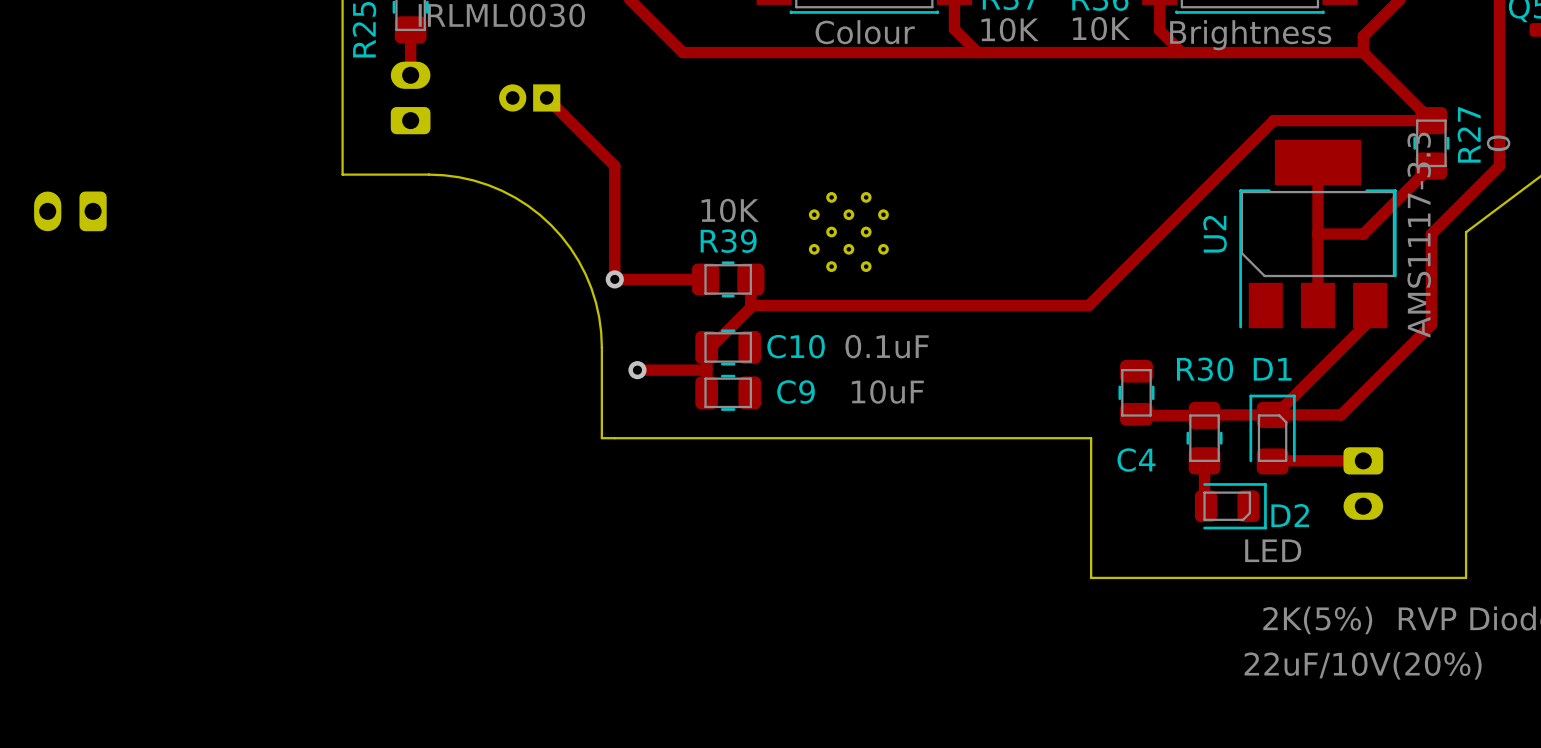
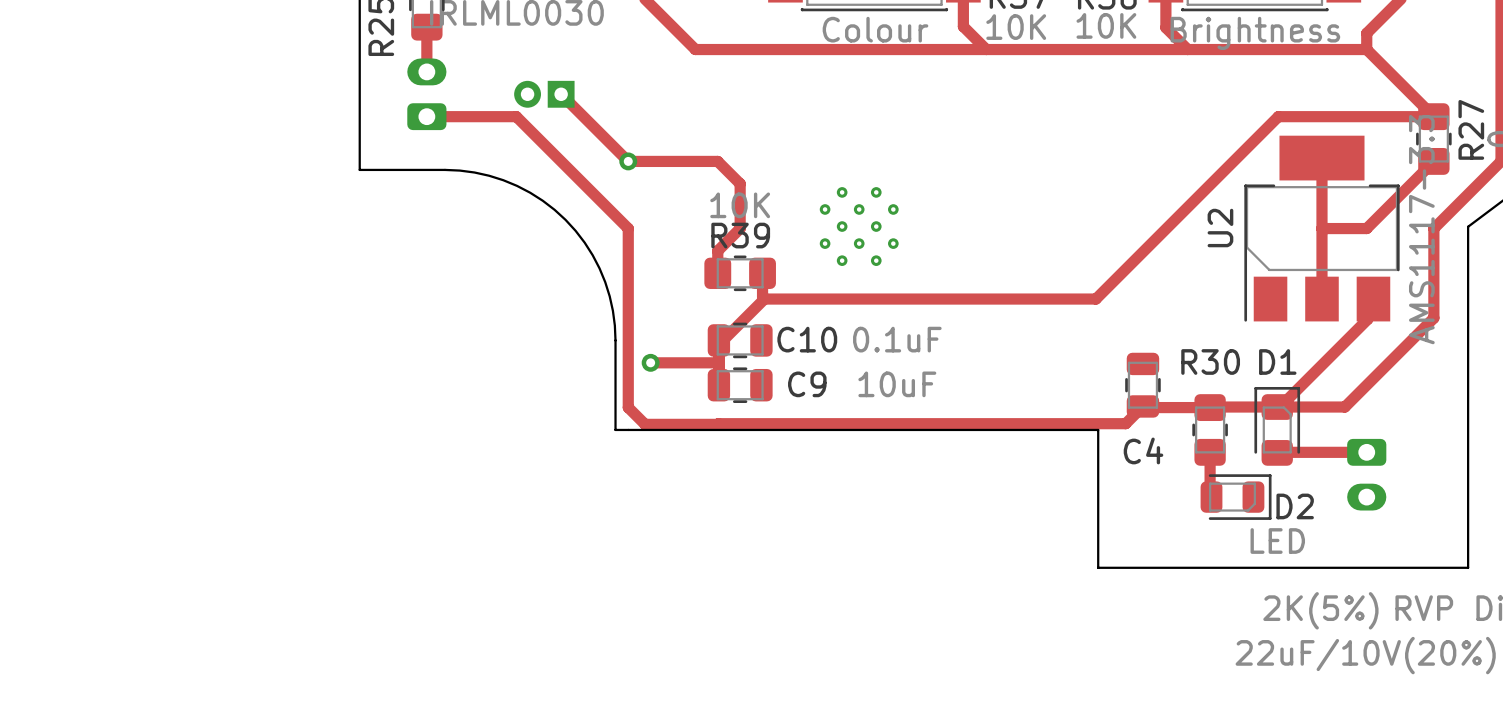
track: none -> (426, 116) (516, 116) (628, 228)
track: (614, 165) (614, 234) -> (628, 161) (717, 161) (740, 183) (740, 228) (717, 250) (717, 273)
part: (70, 211) -> none
track: (614, 279) (705, 279) -> (628, 273) (628, 407) (645, 424) (1125, 423) (1142, 406)
via position: (614, 279) -> (628, 161)

